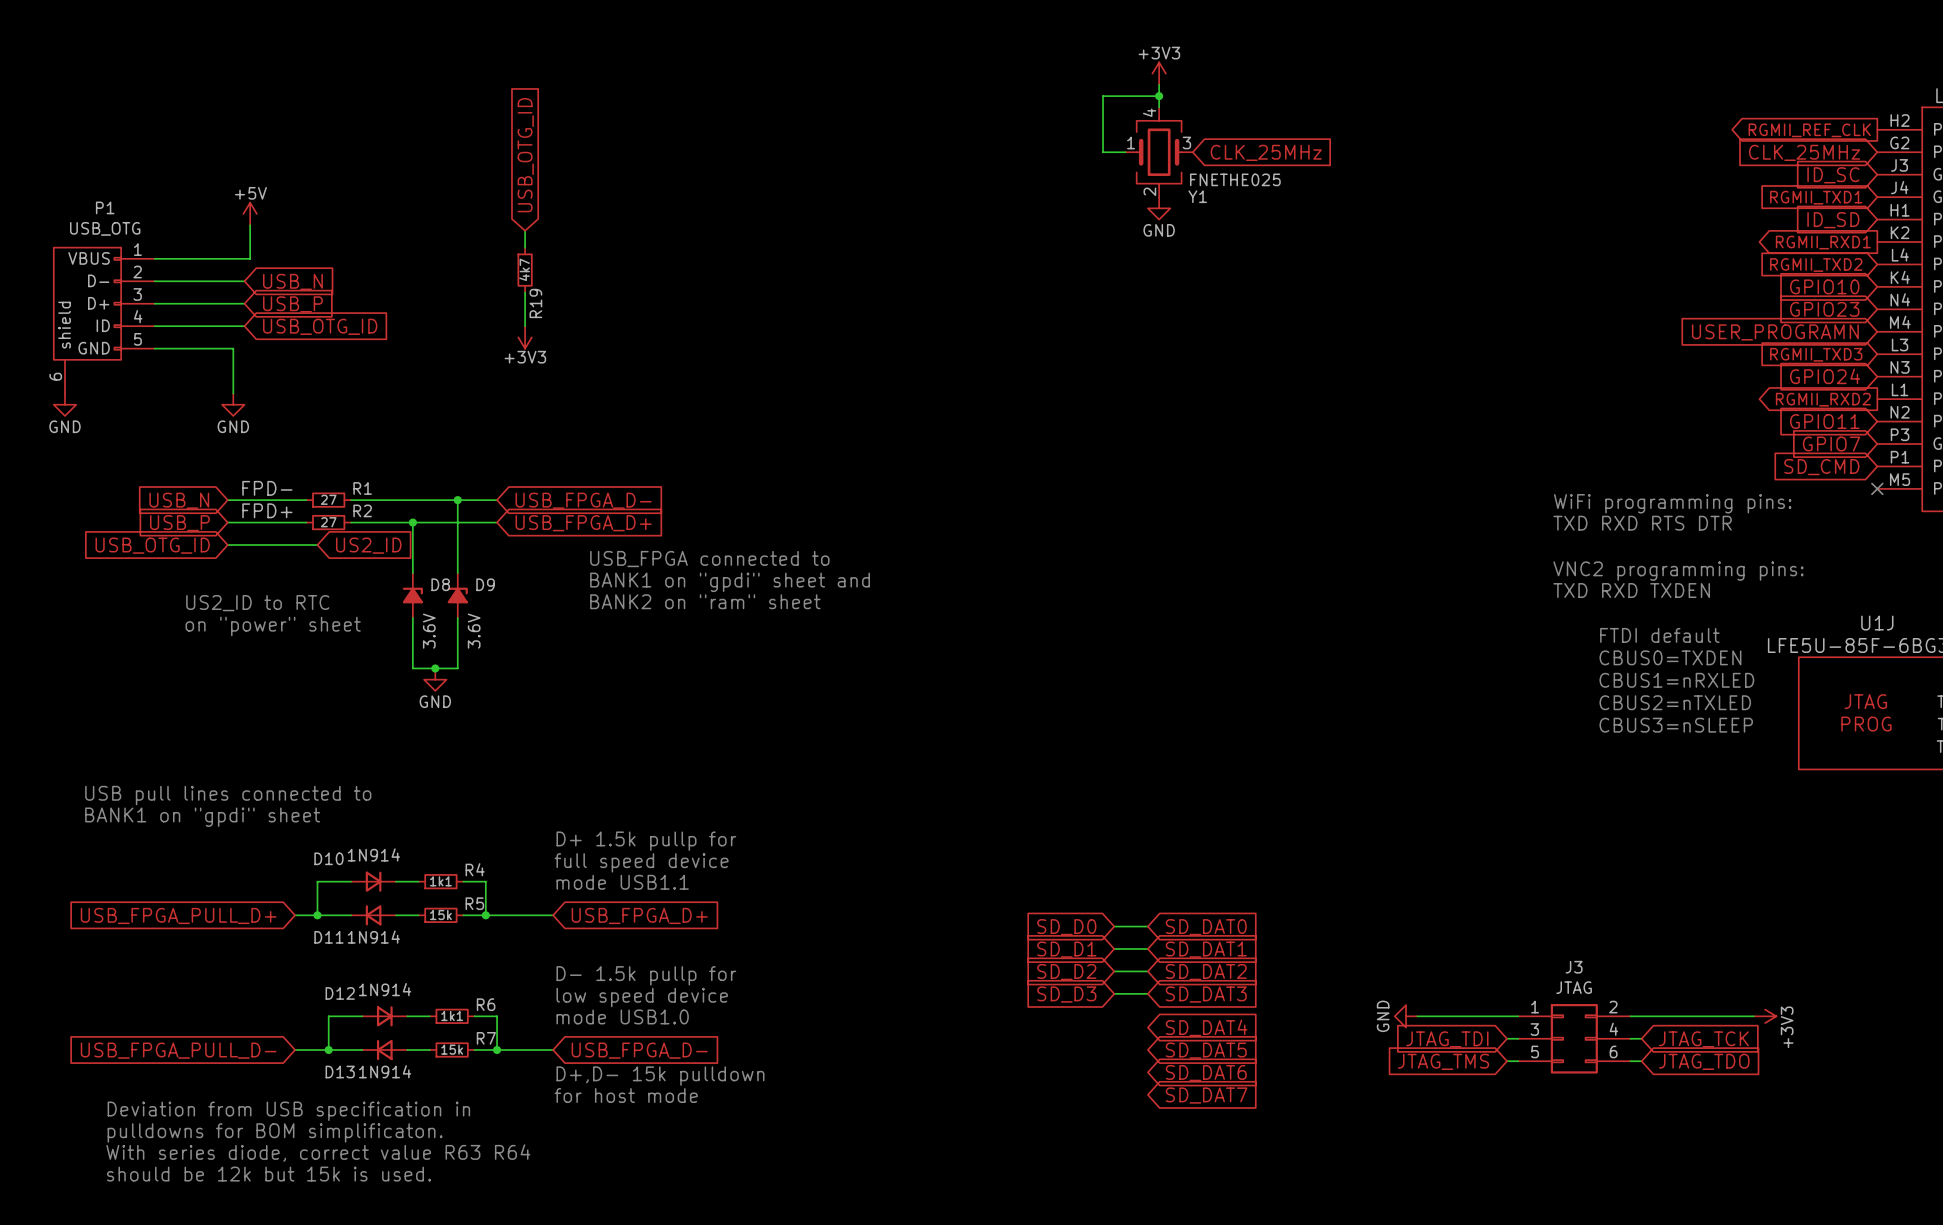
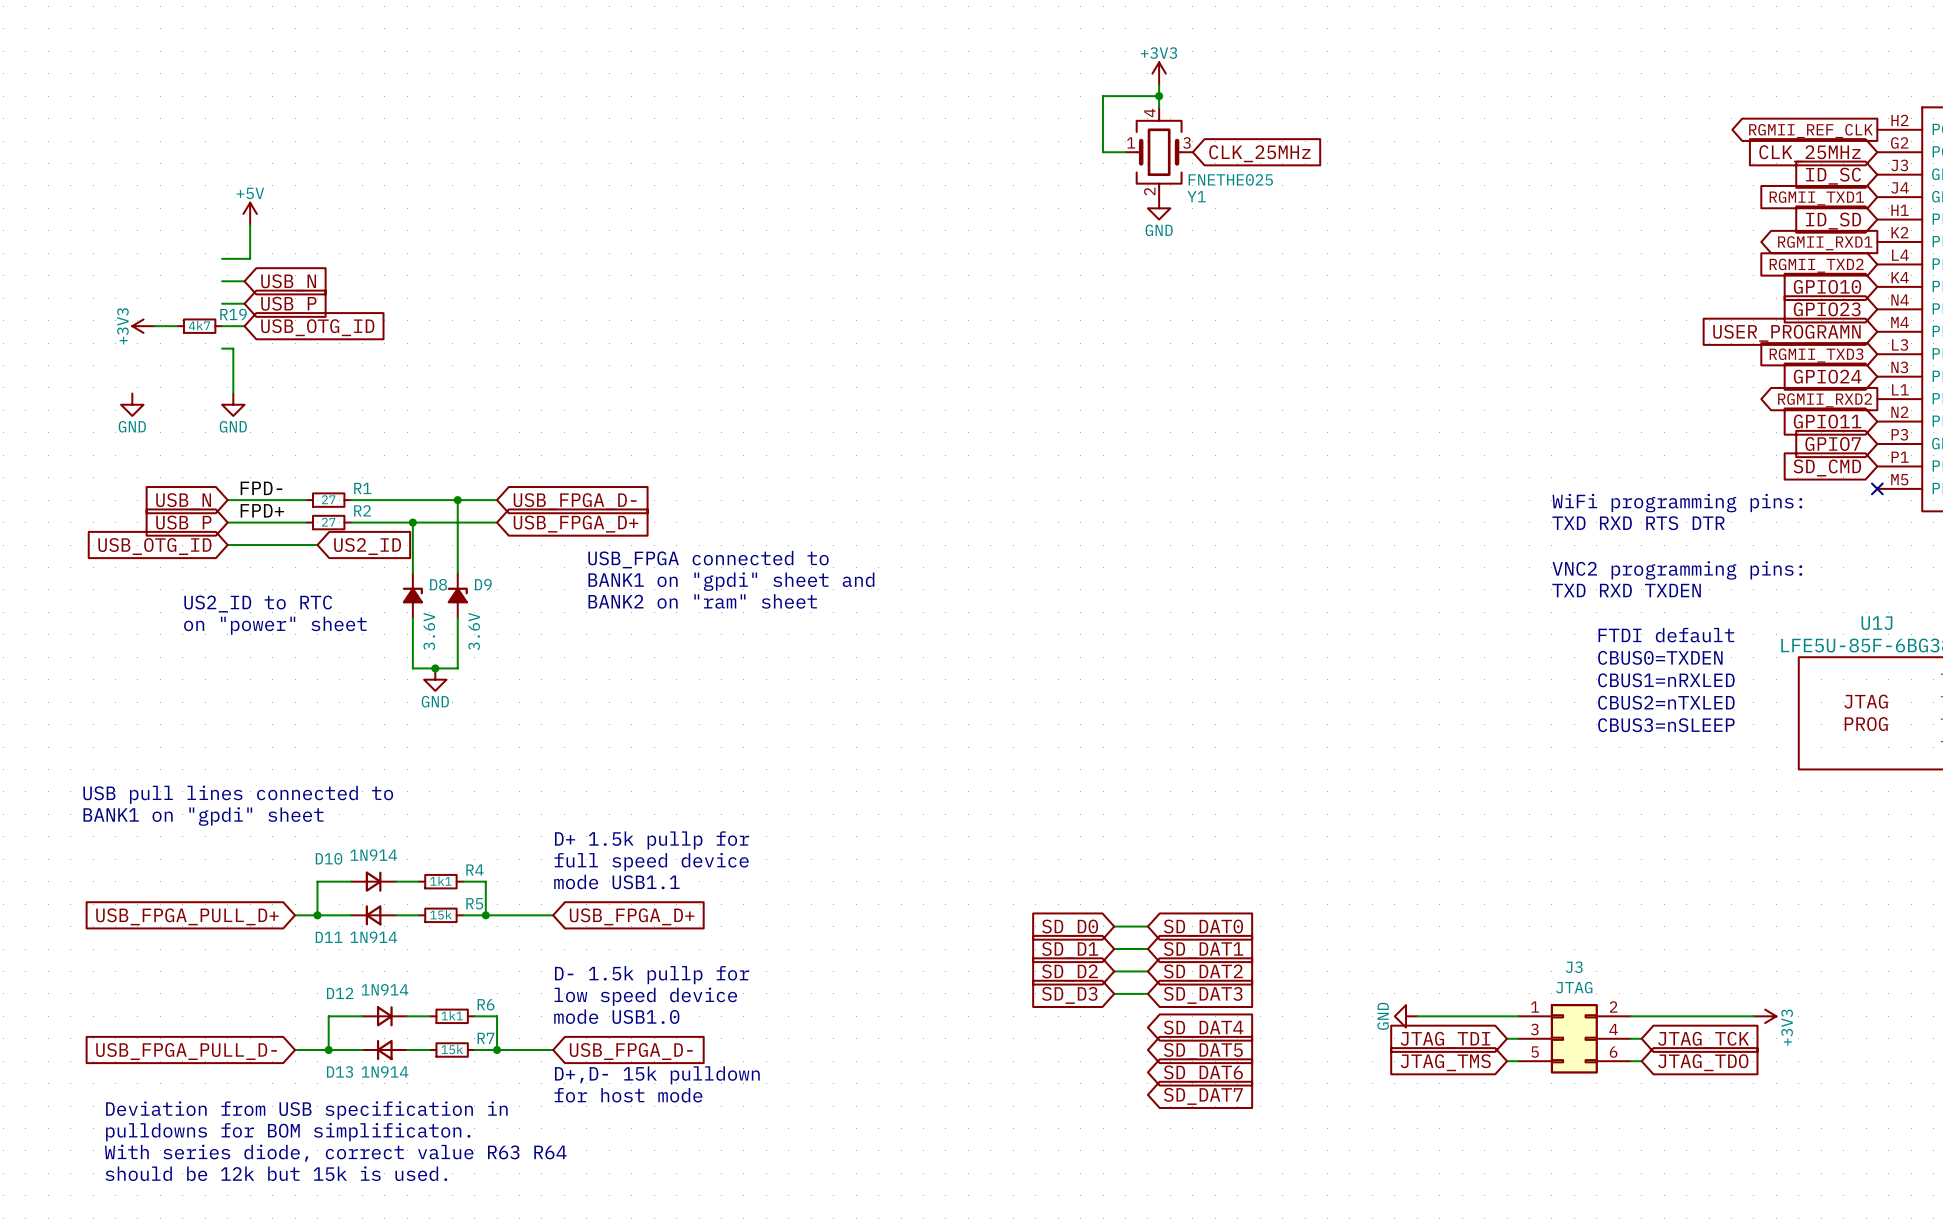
global label: USB_OTG_ID (525, 155) -> none
wire: (525, 230) (525, 247) -> none
wire: (154, 258) (222, 258) -> none
R19 rotation: 0° (525, 270) -> 90° clockwise (199, 326)
R19 position: (525, 270) -> (199, 326)
wire: (154, 281) (222, 281) -> none
wire: (525, 292) (525, 326) -> none
wire: (154, 303) (222, 303) -> none
R19 name position: R19 (535, 303) -> R19 (233, 314)
P1: USB_OTG (104, 320) -> none
power symbol: none -> +3V3 (143, 326)
power symbol: +3V3 (525, 337) -> none
wire: (154, 348) (222, 348) -> none
power symbol position: GND (64, 404) -> GND (132, 404)

